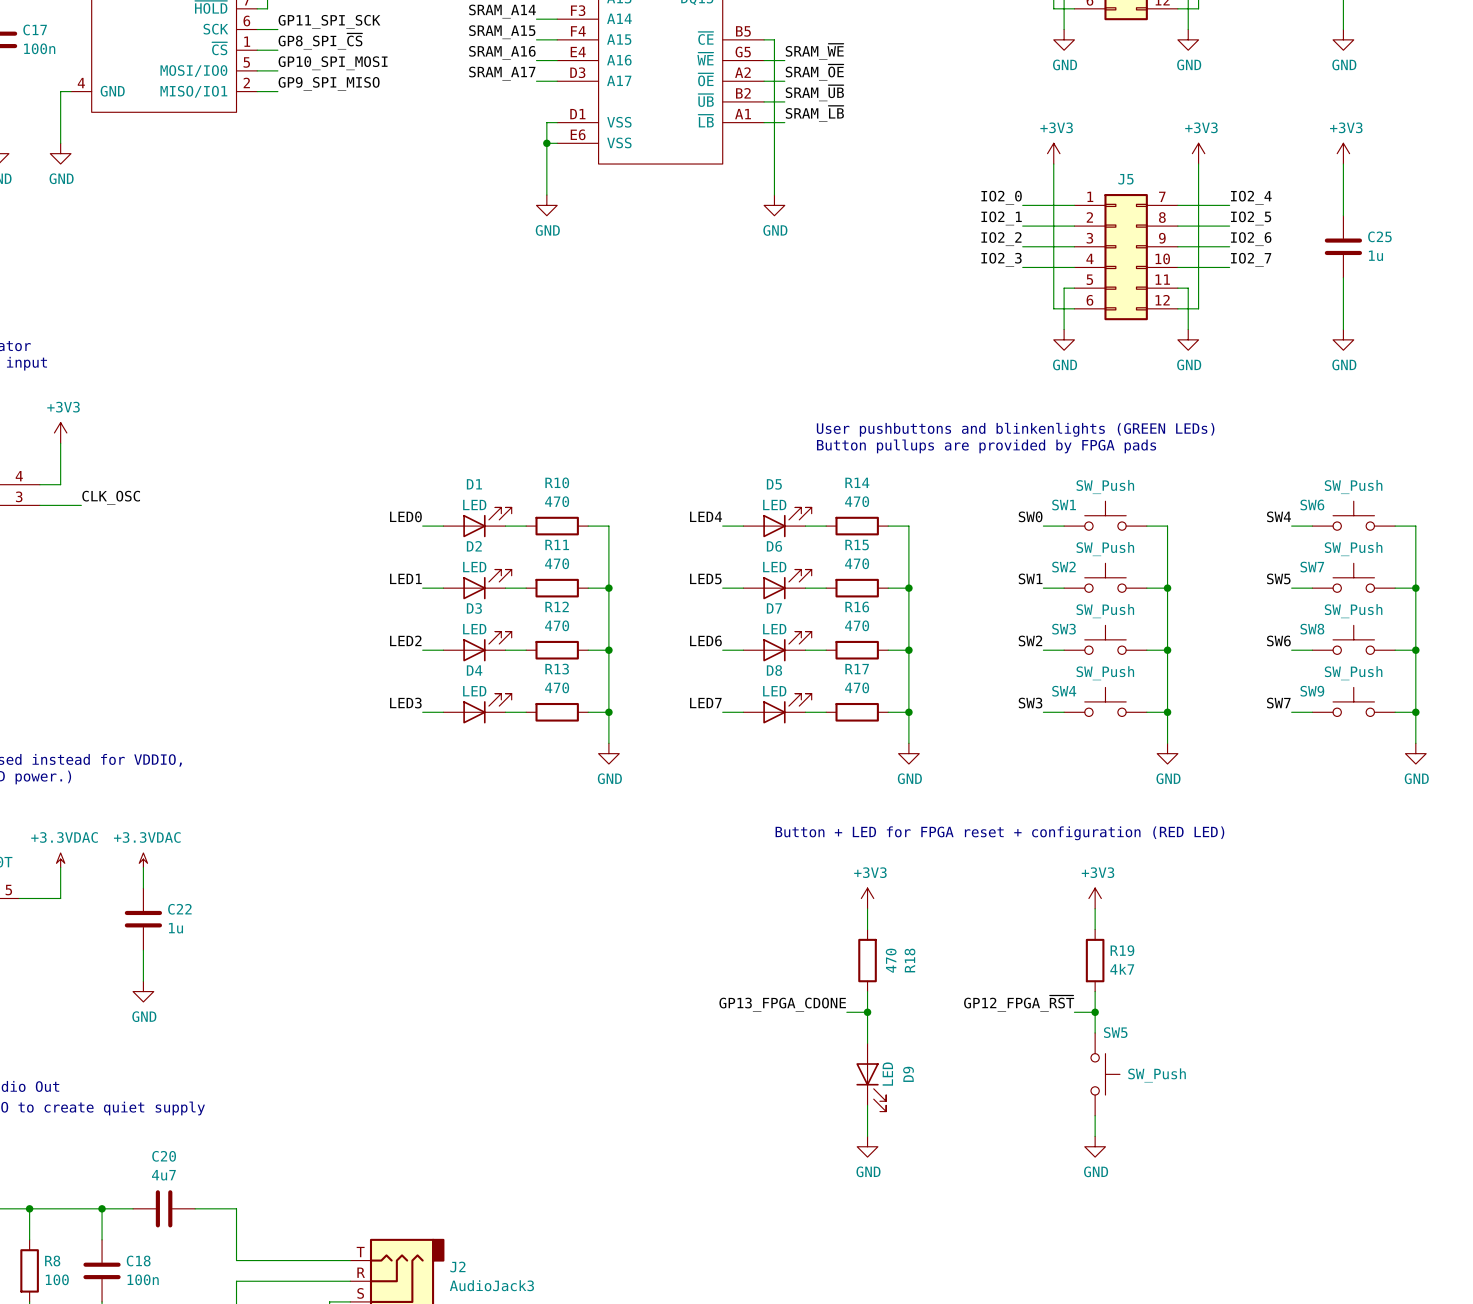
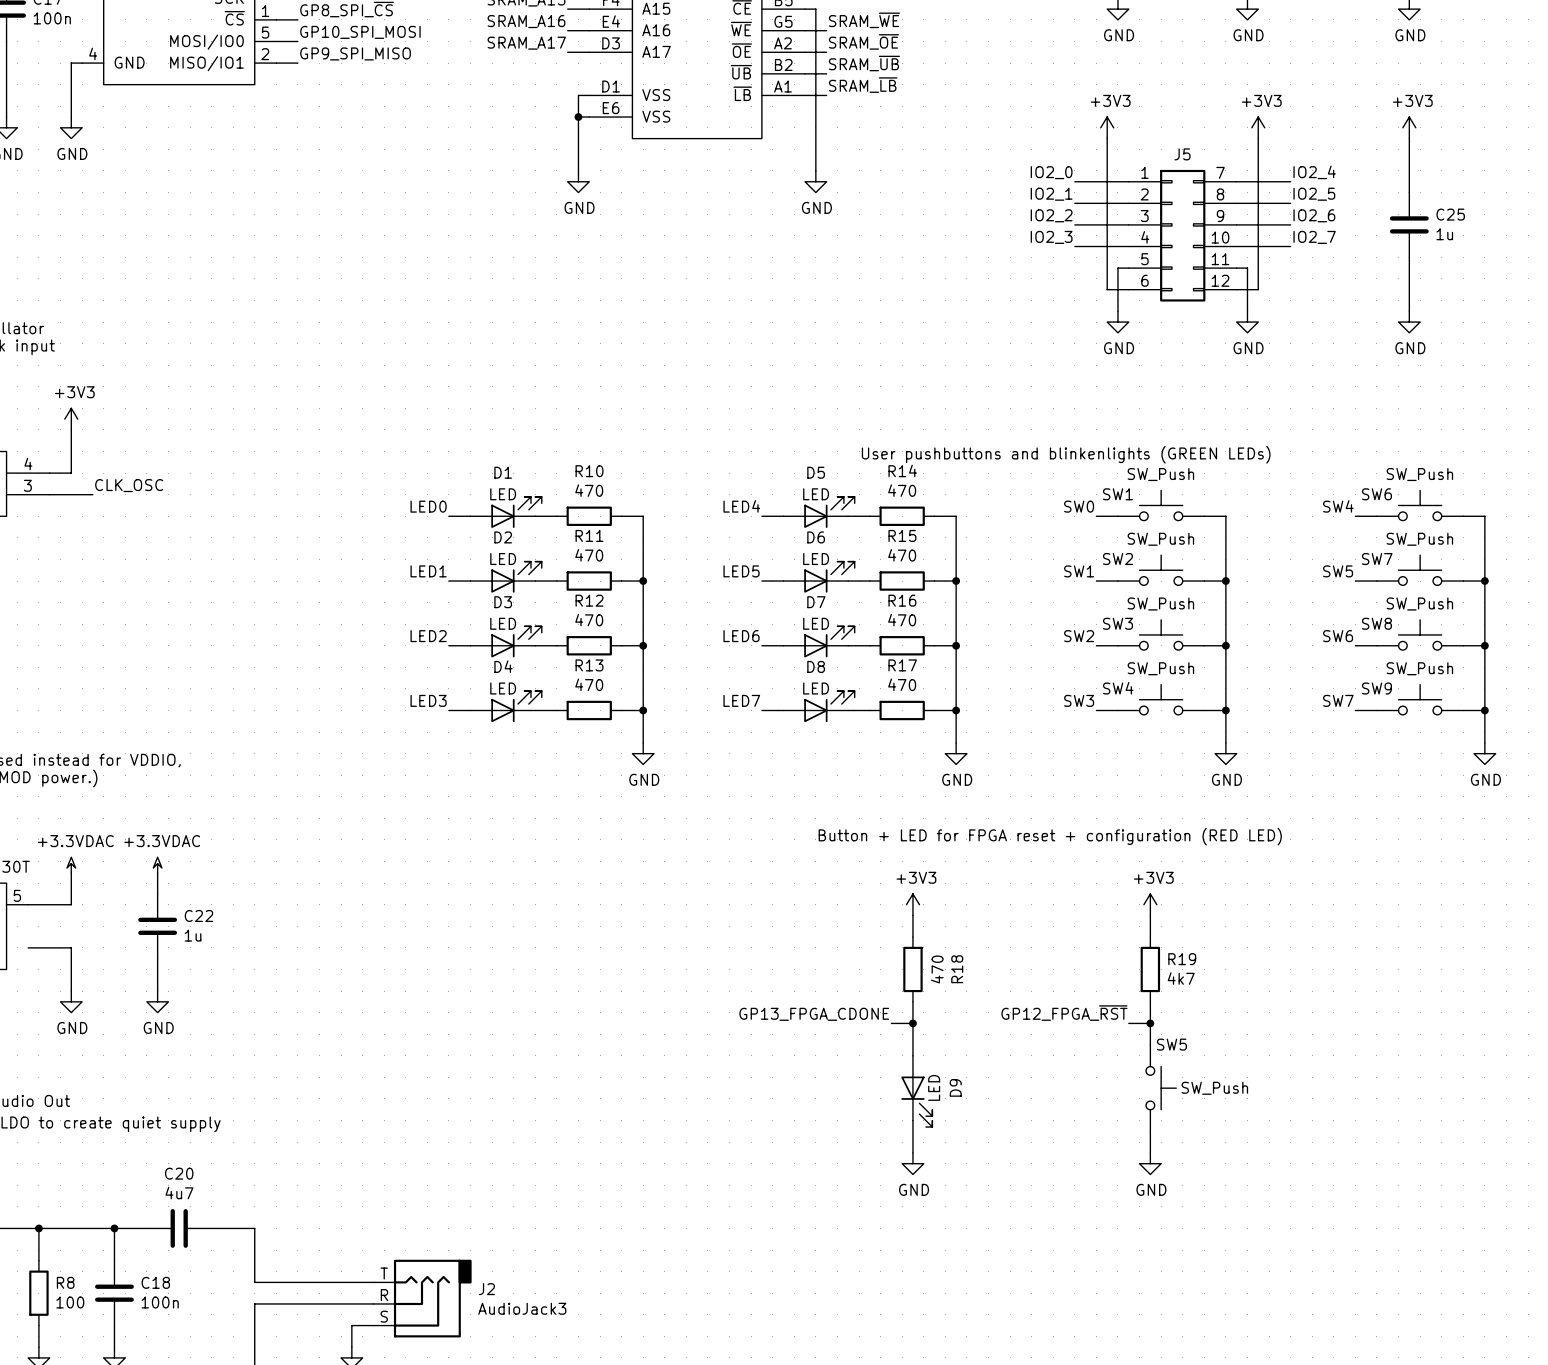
text position: User pushbuttons and blinkenlights (GREEN LEDs) (1015, 429) -> User pushbuttons and blinkenlights (GREEN LEDs) (1066, 454)
text: Button pullups are provided by FPGA pads (986, 446) -> none
wire: none -> (28, 947) (71, 947) (71, 991)
power symbol: none -> GND (71, 1001)

